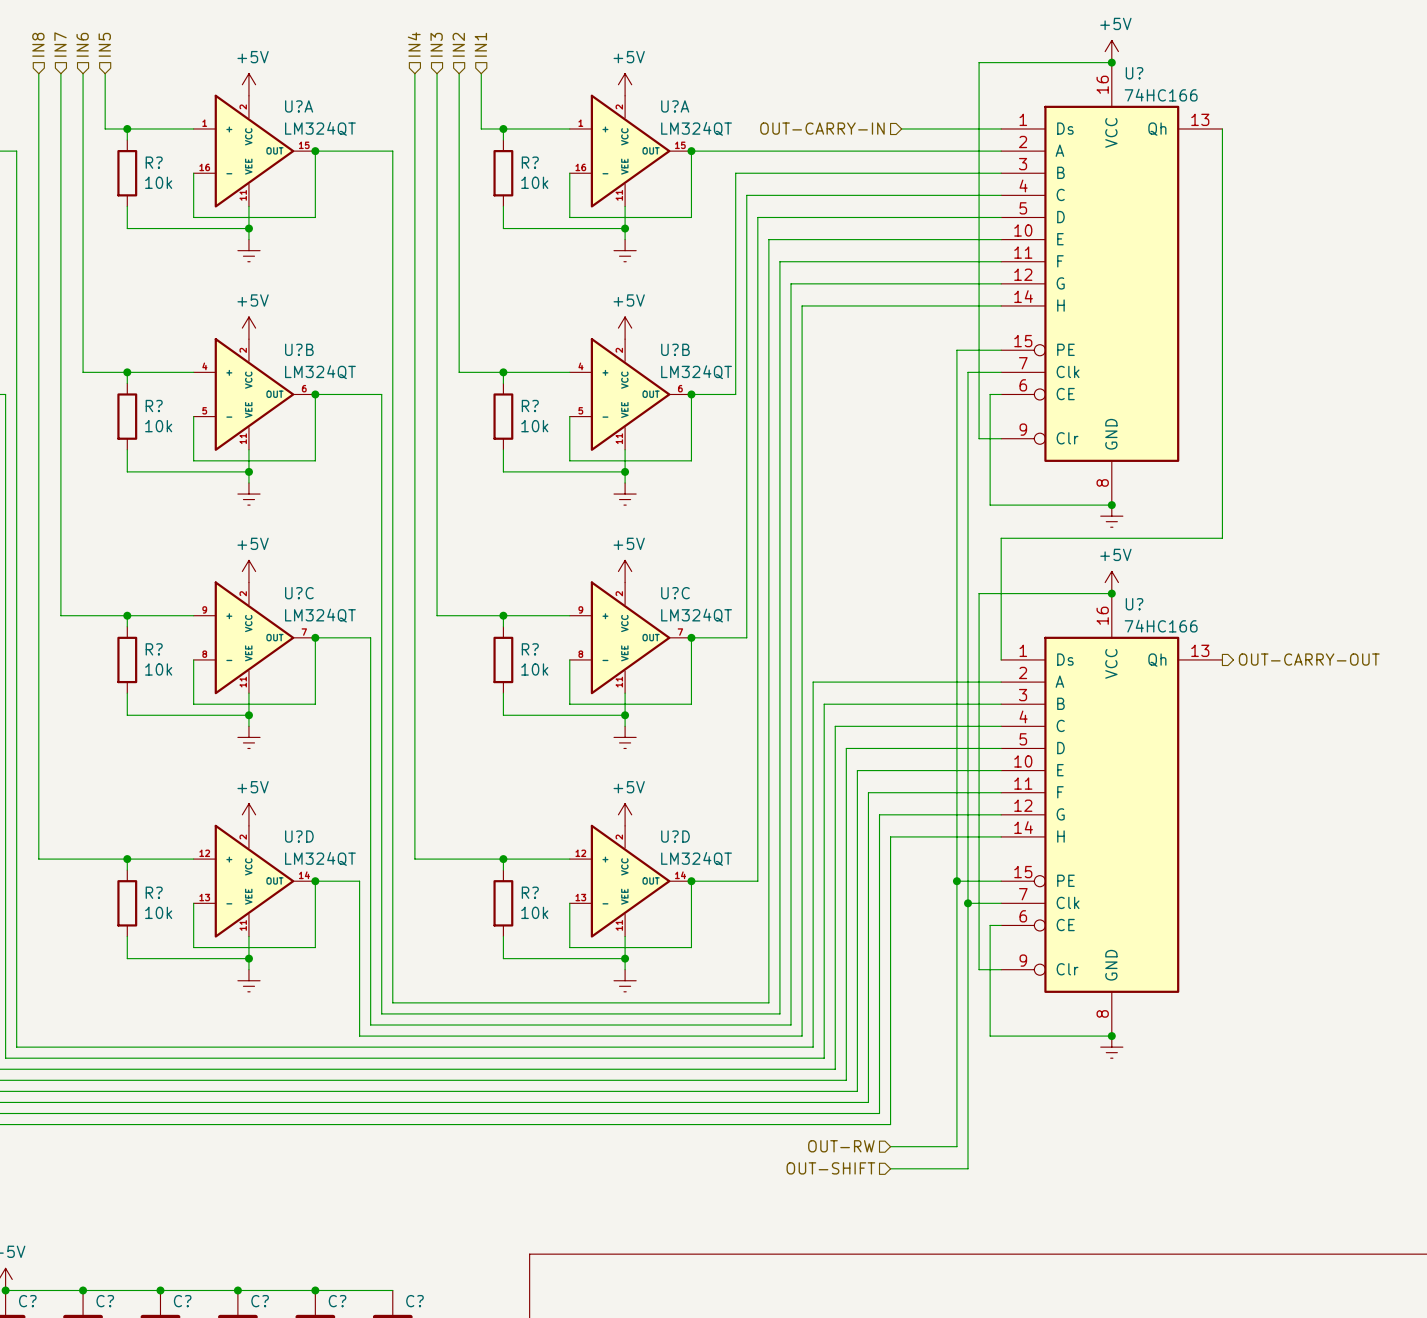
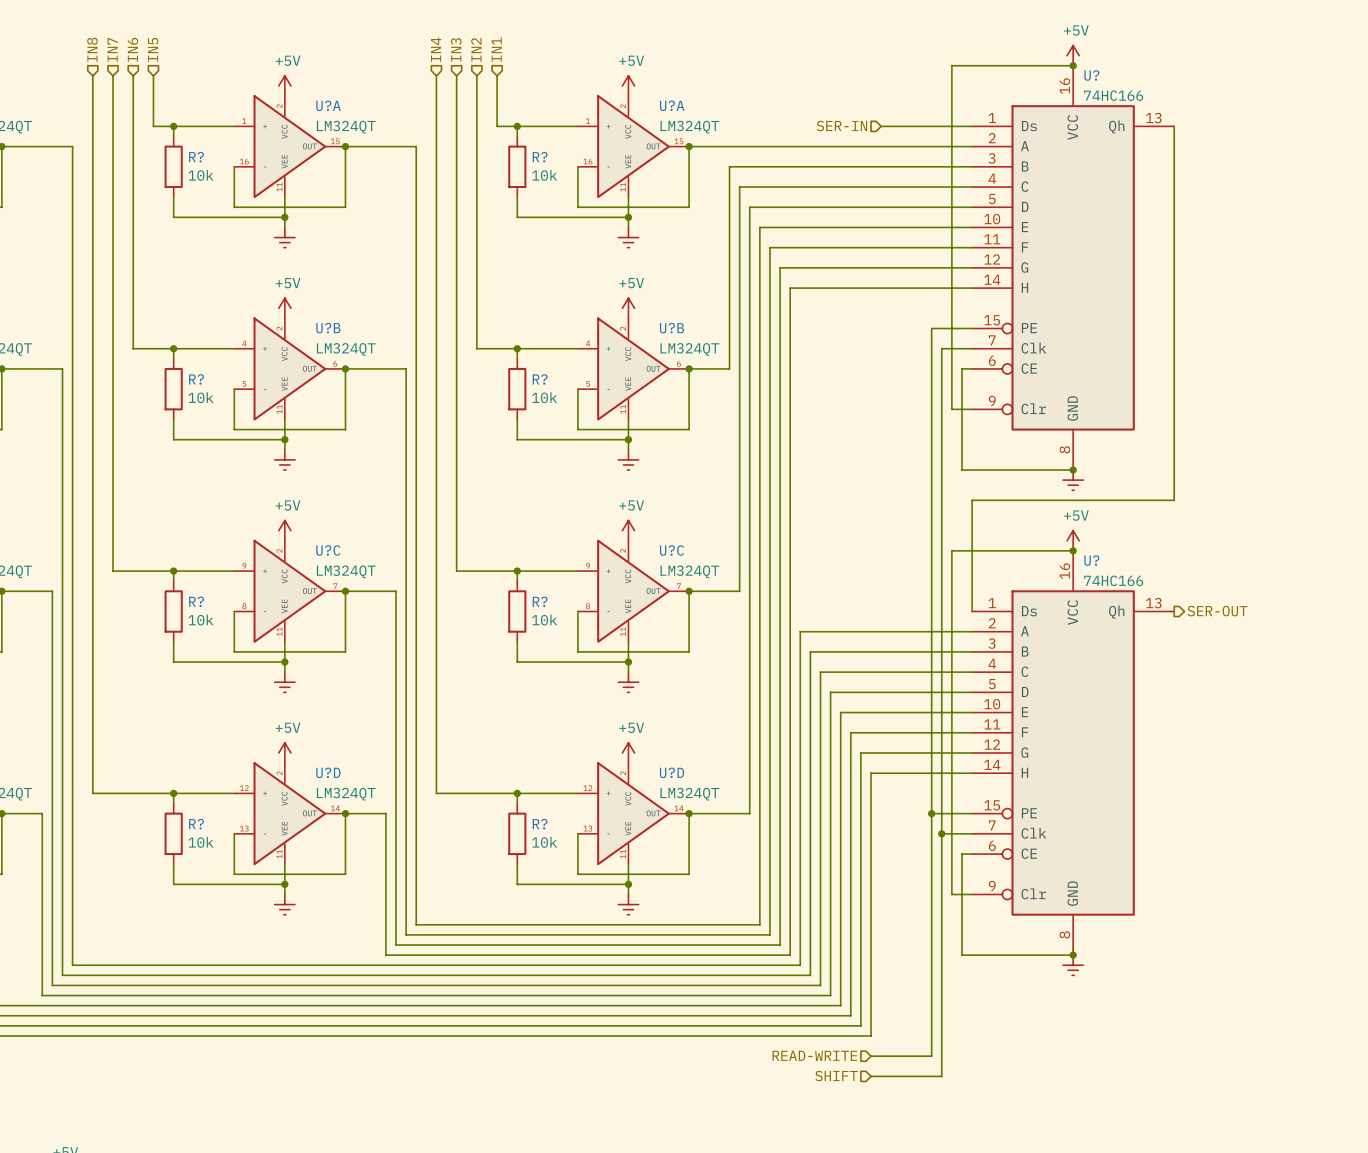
hierarchical label: OUT-CARRY-IN (822, 128) -> SER-IN (841, 126)
hierarchical label: OUT-CARRY-OUT (1309, 659) -> SER-OUT (1217, 611)
hierarchical label: OUT-RW (841, 1146) -> READ-WRITE (814, 1055)
hierarchical label: OUT-SHIFT (830, 1168) -> SHIFT (836, 1076)

